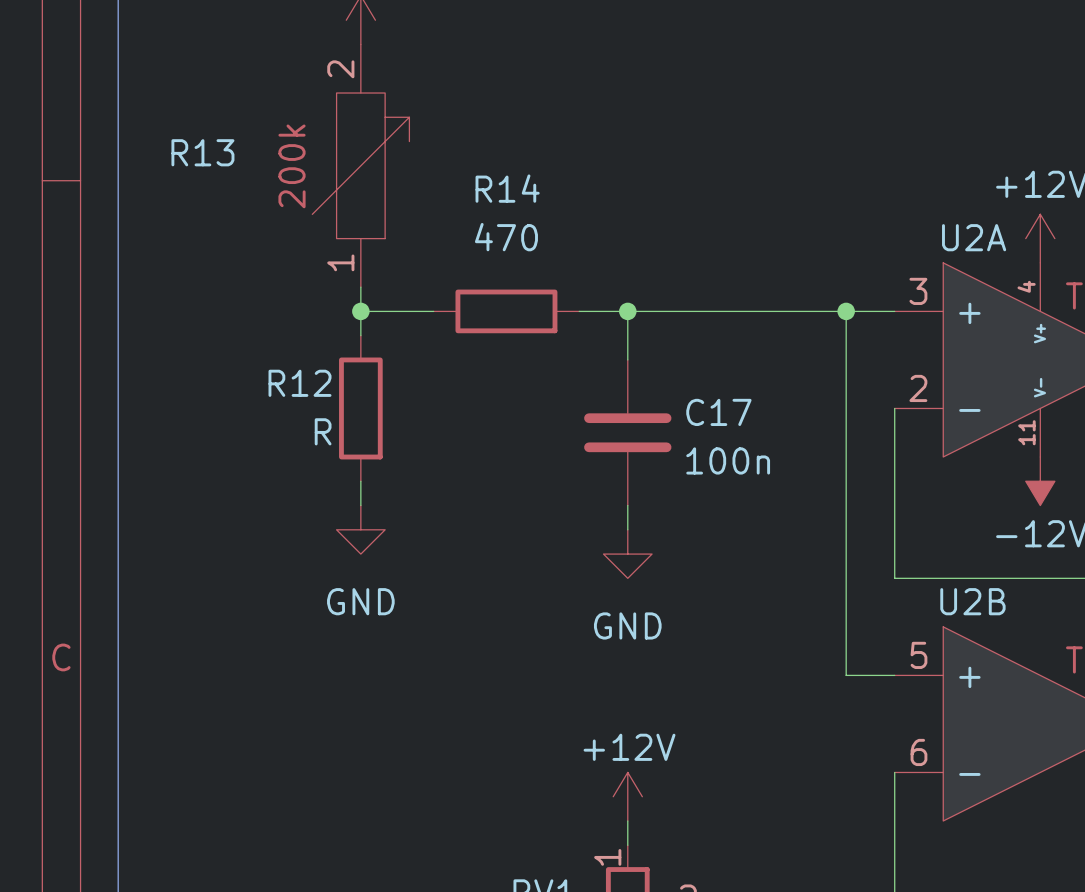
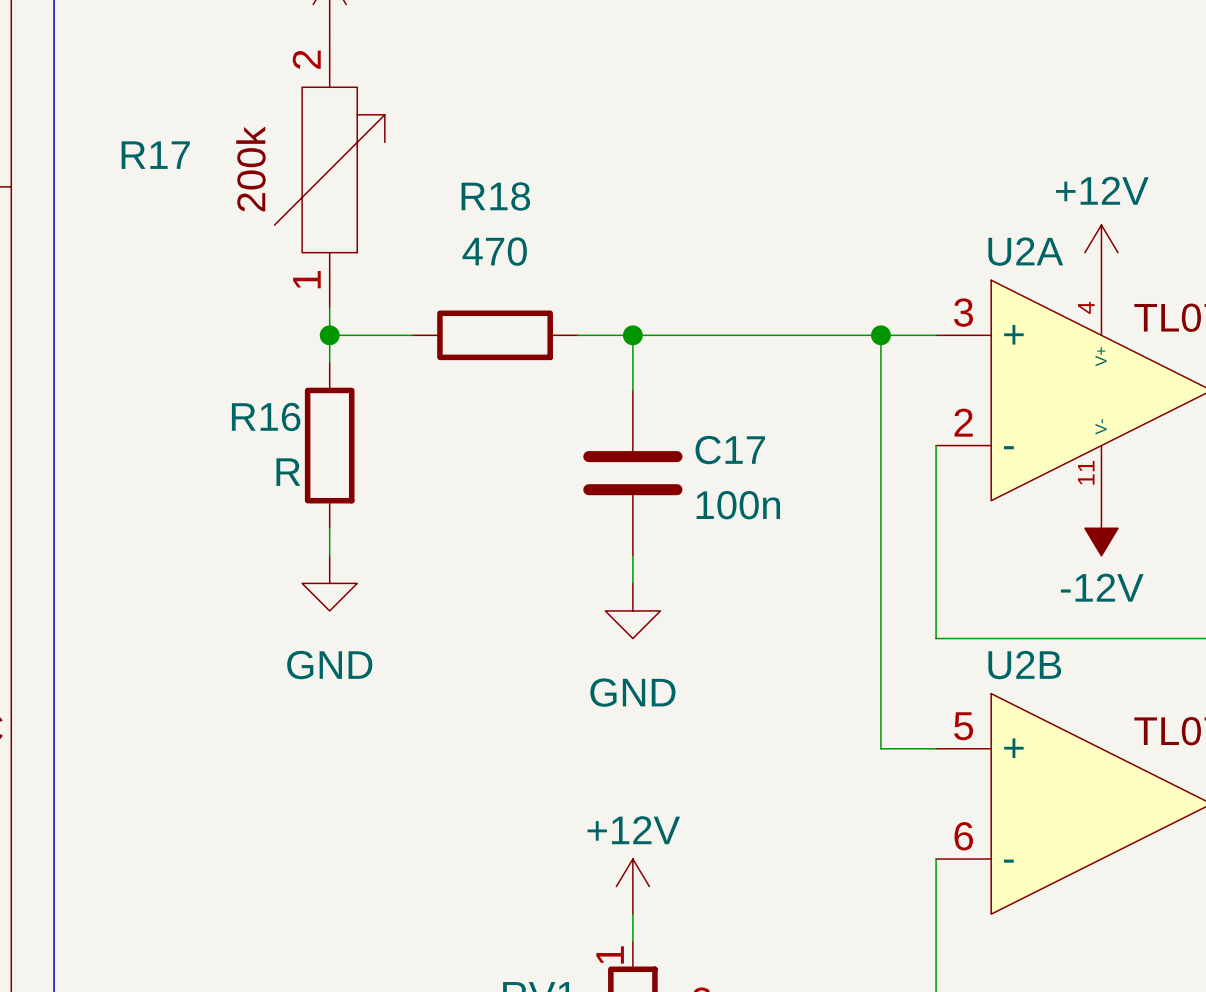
R13 name: R13 (202, 152) -> R17 (155, 155)
R14 name: R14 (507, 188) -> R18 (495, 196)
R12 name: R12 (300, 383) -> R16 (266, 416)

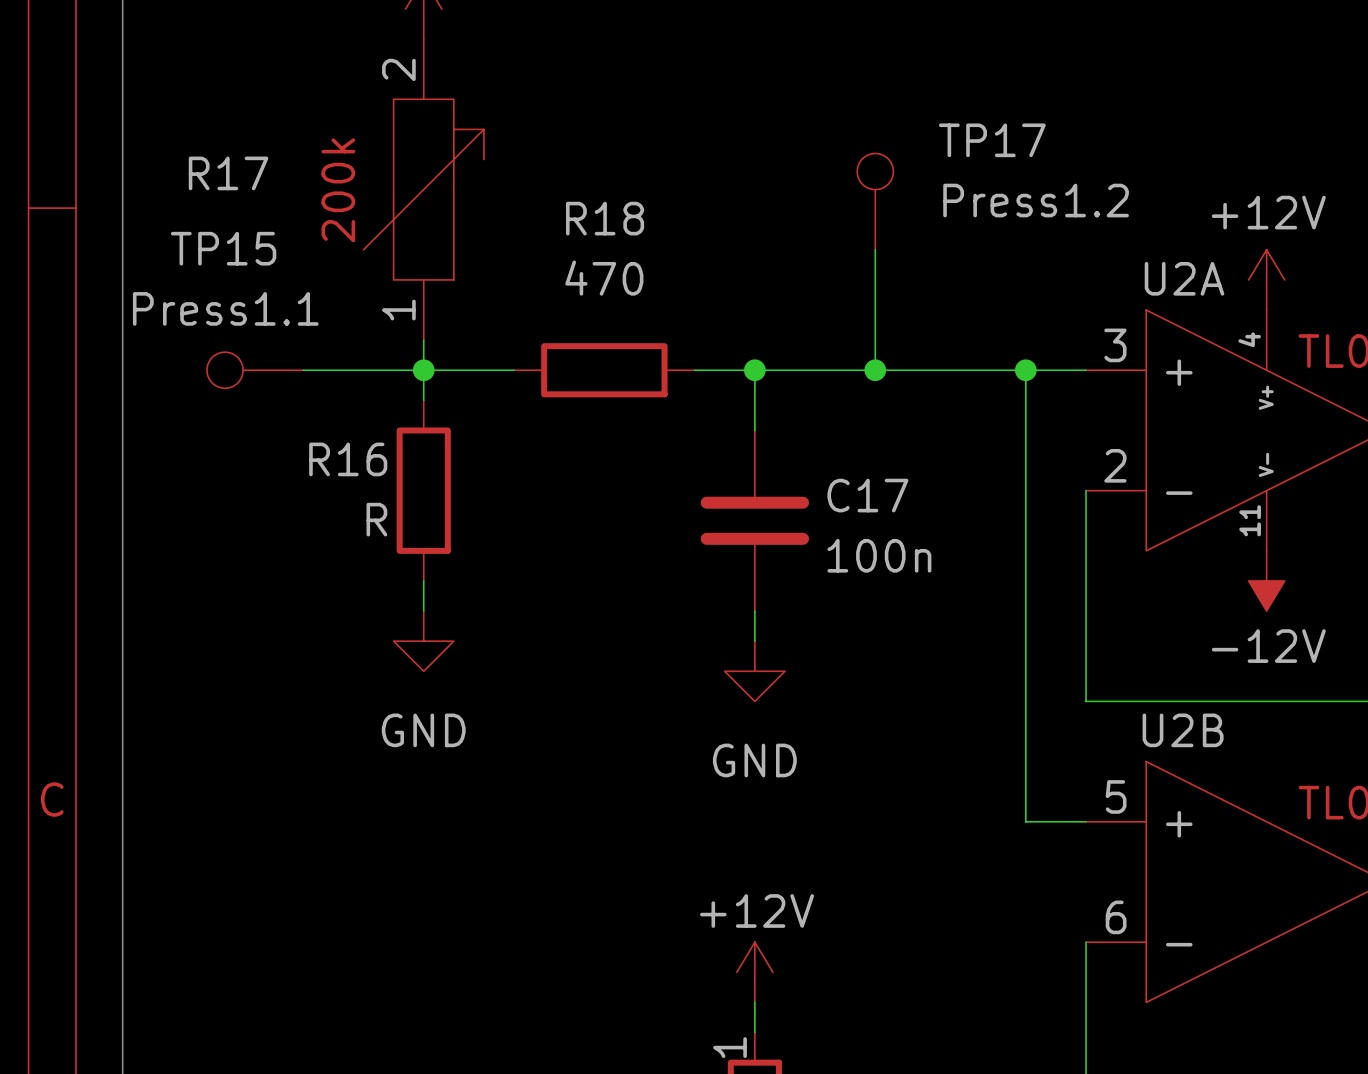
TP17: none -> Press1.2 (875, 201)
wire: none -> (875, 249) (875, 370)
TP15: none -> Press1.1 (255, 370)
wire: none -> (303, 370) (423, 370)
junction: none -> (875, 370)

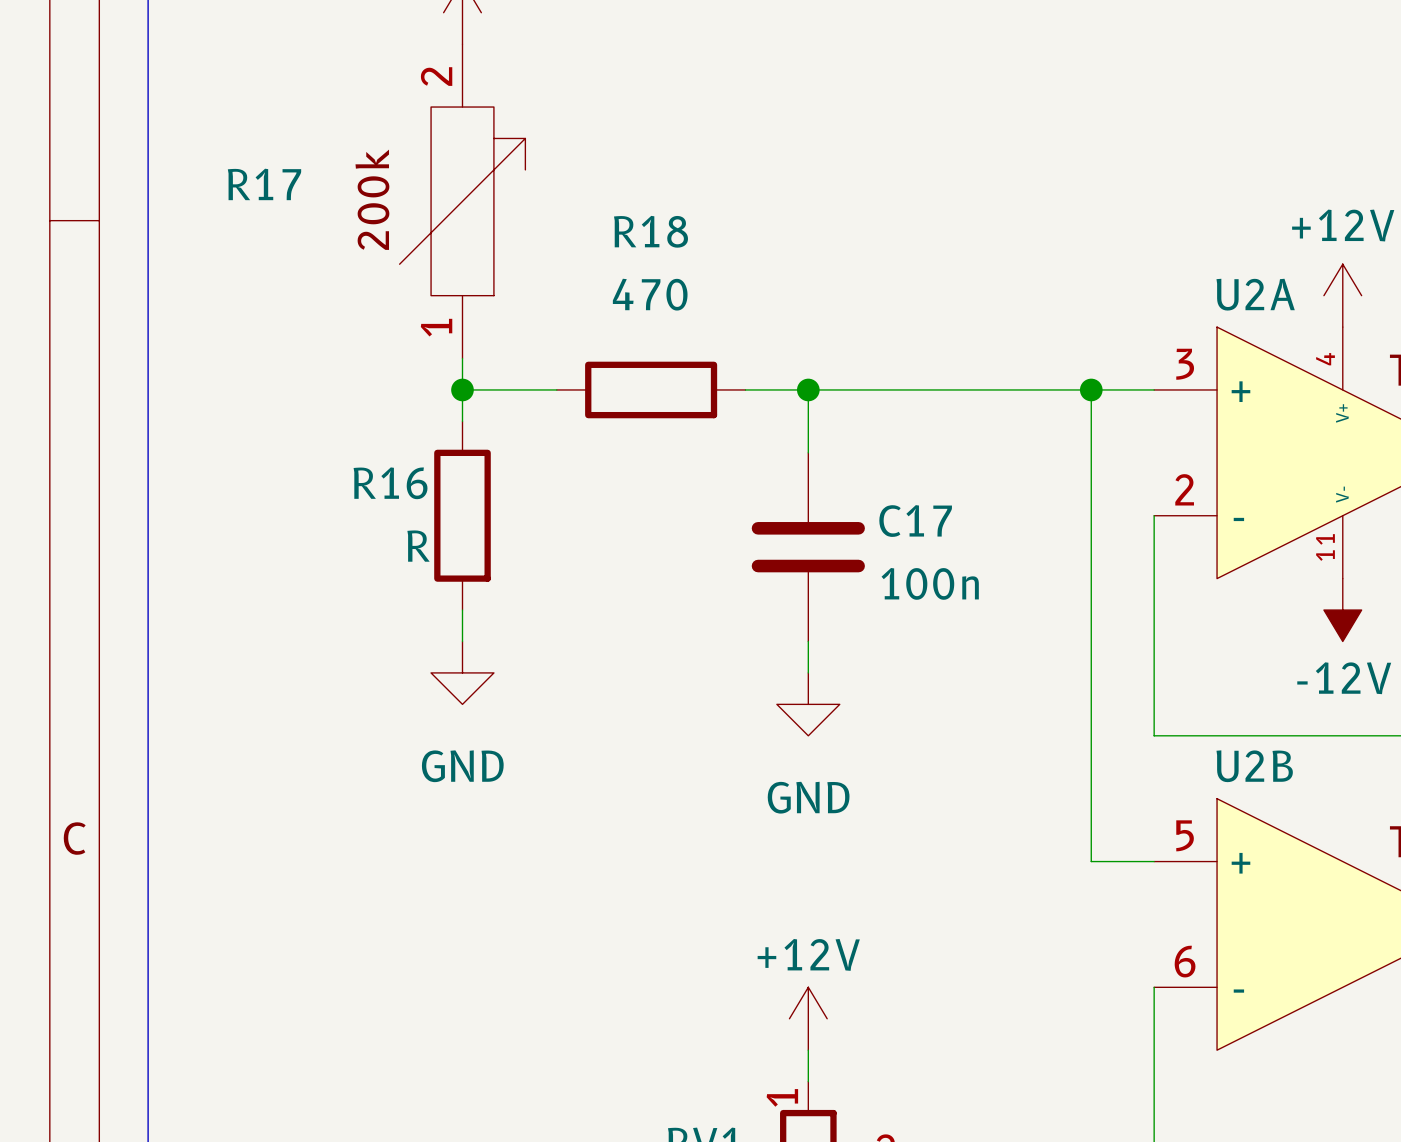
TP17: Press1.2 (875, 201) -> none
wire: (875, 249) (875, 370) -> none
TP15: Press1.1 (255, 370) -> none
wire: (303, 370) (423, 370) -> none
junction: (875, 370) -> none

